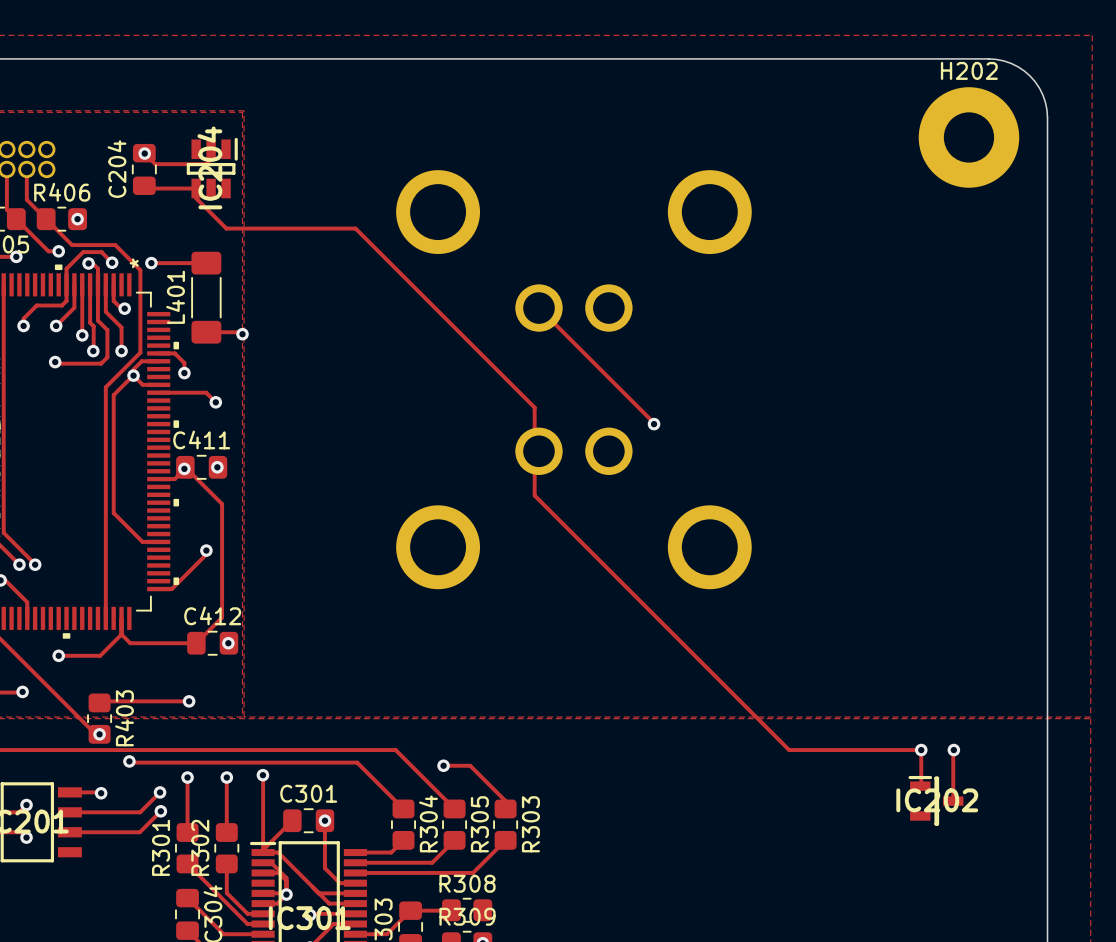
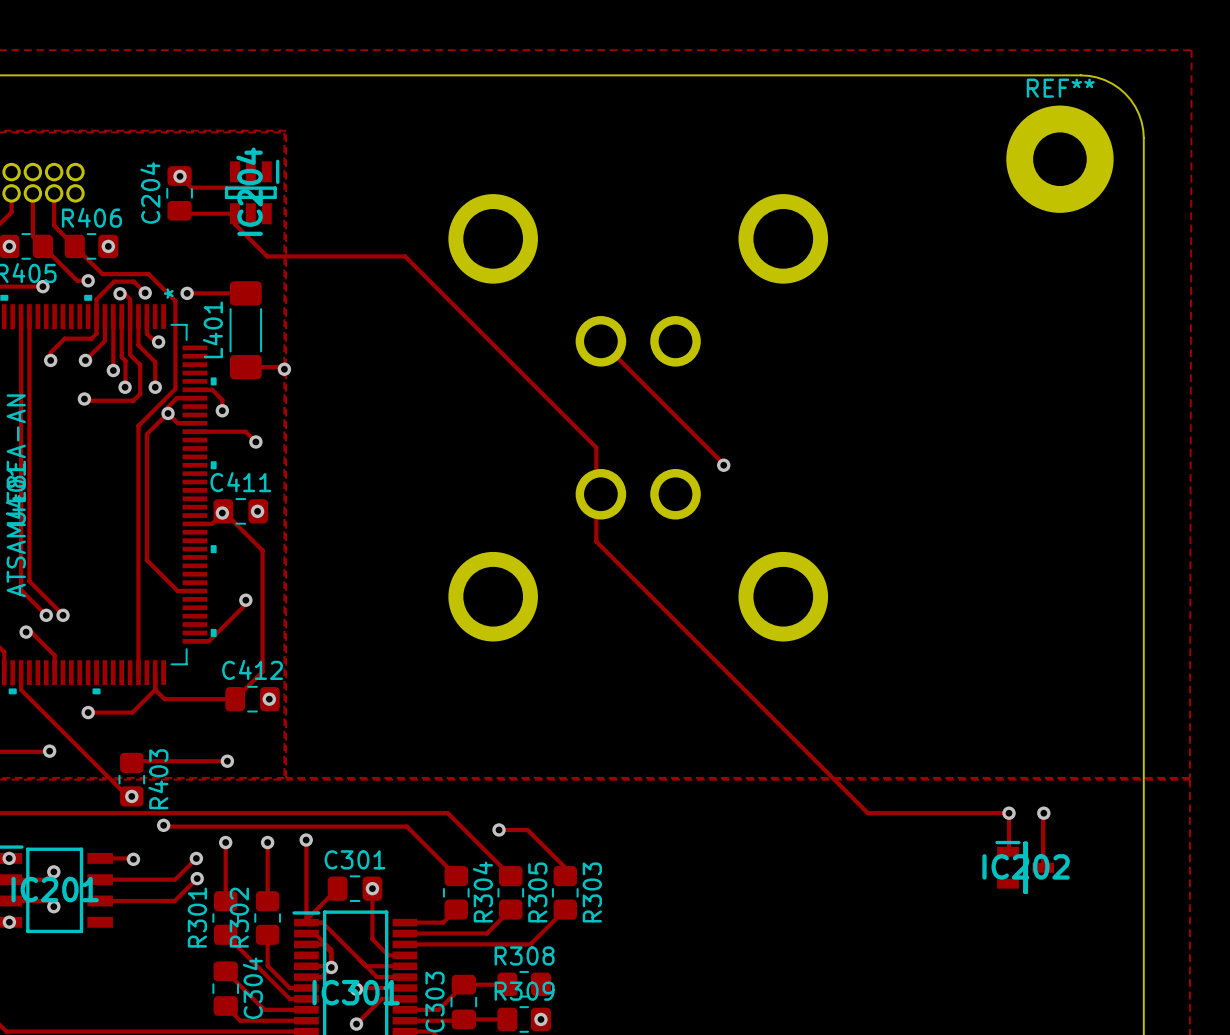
H202 name: H202 (969, 70) -> REF** (1060, 88)

